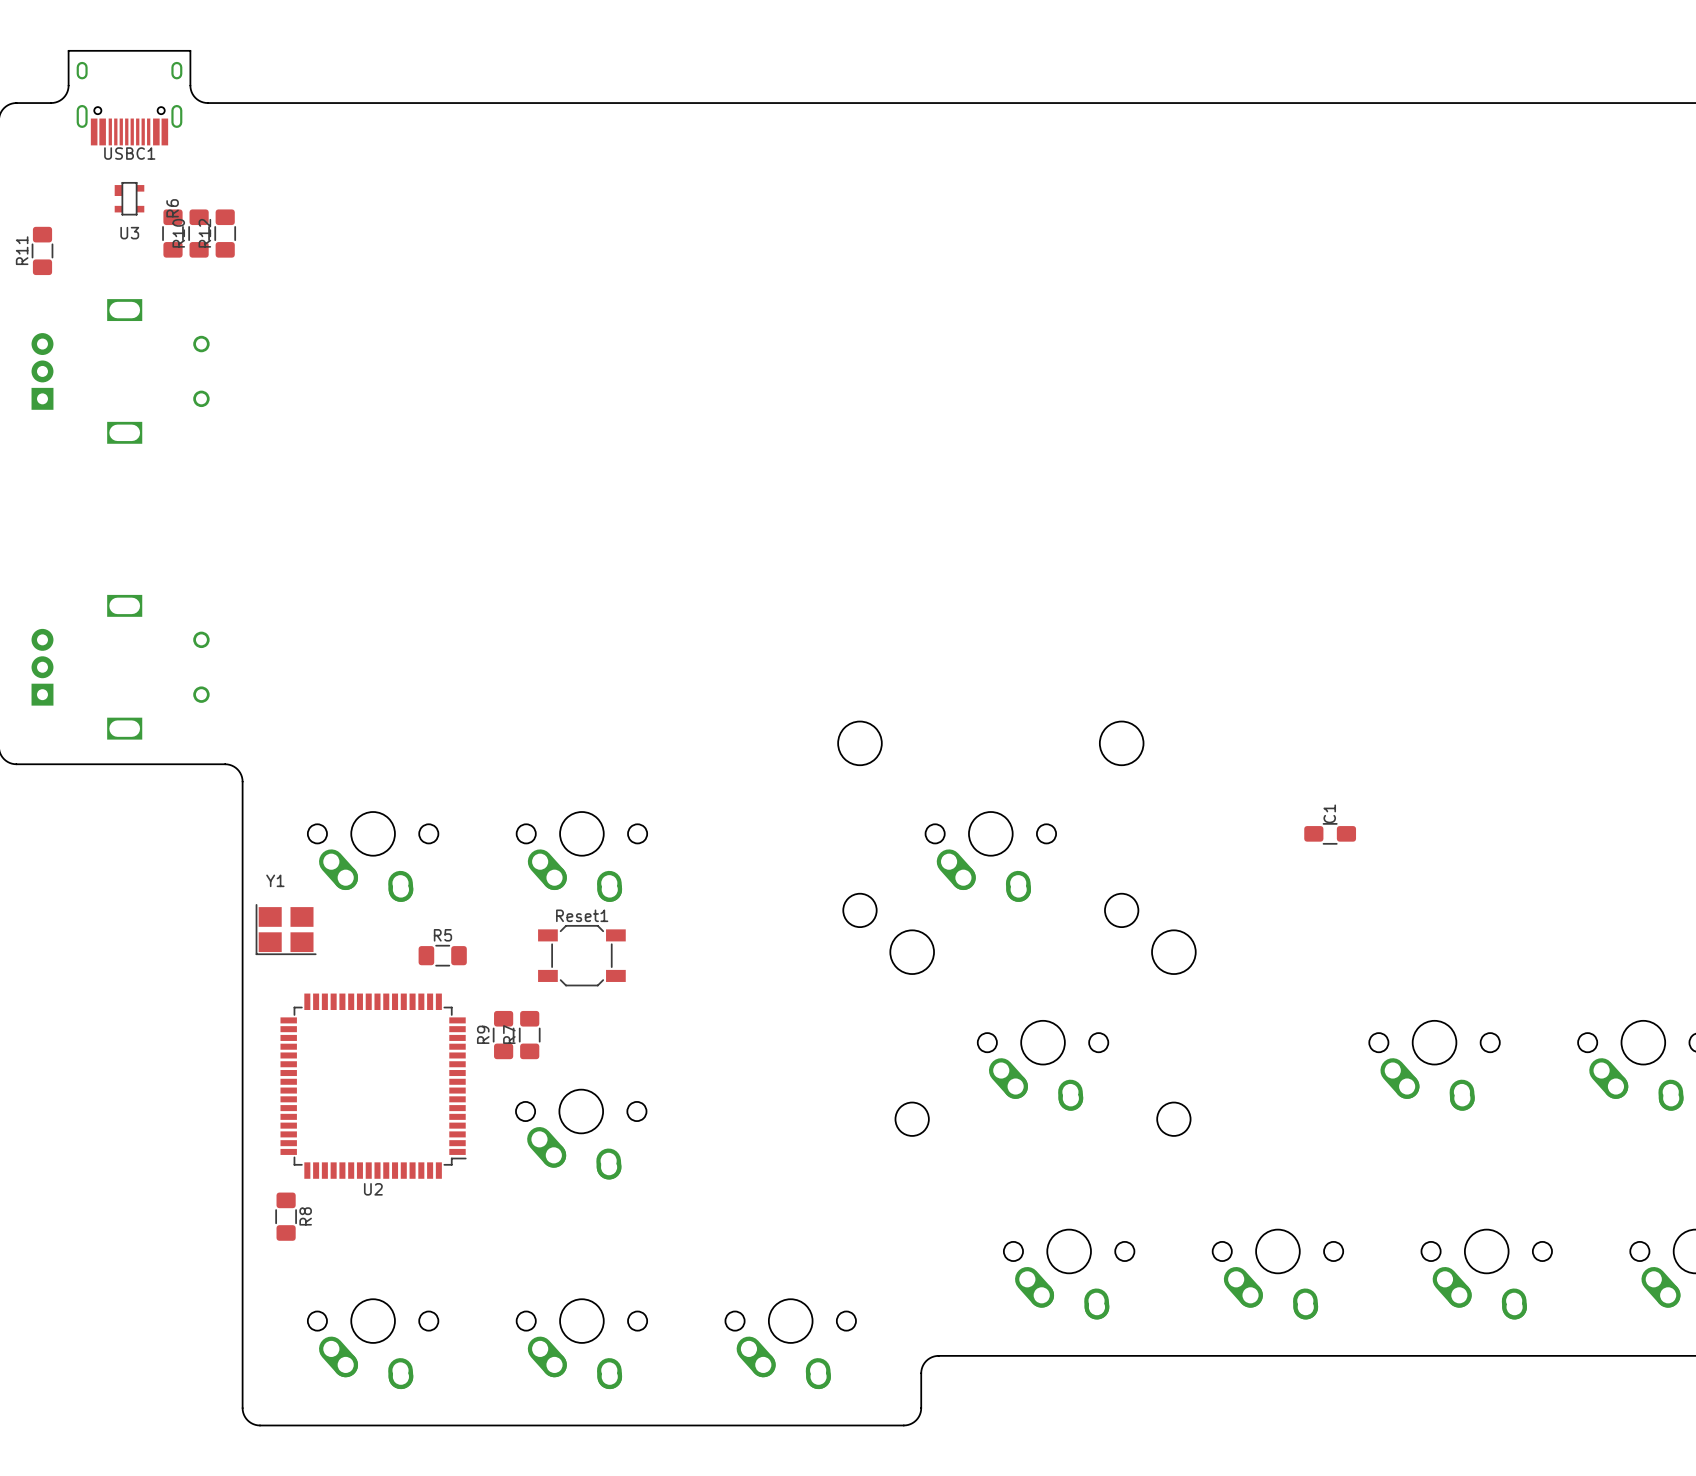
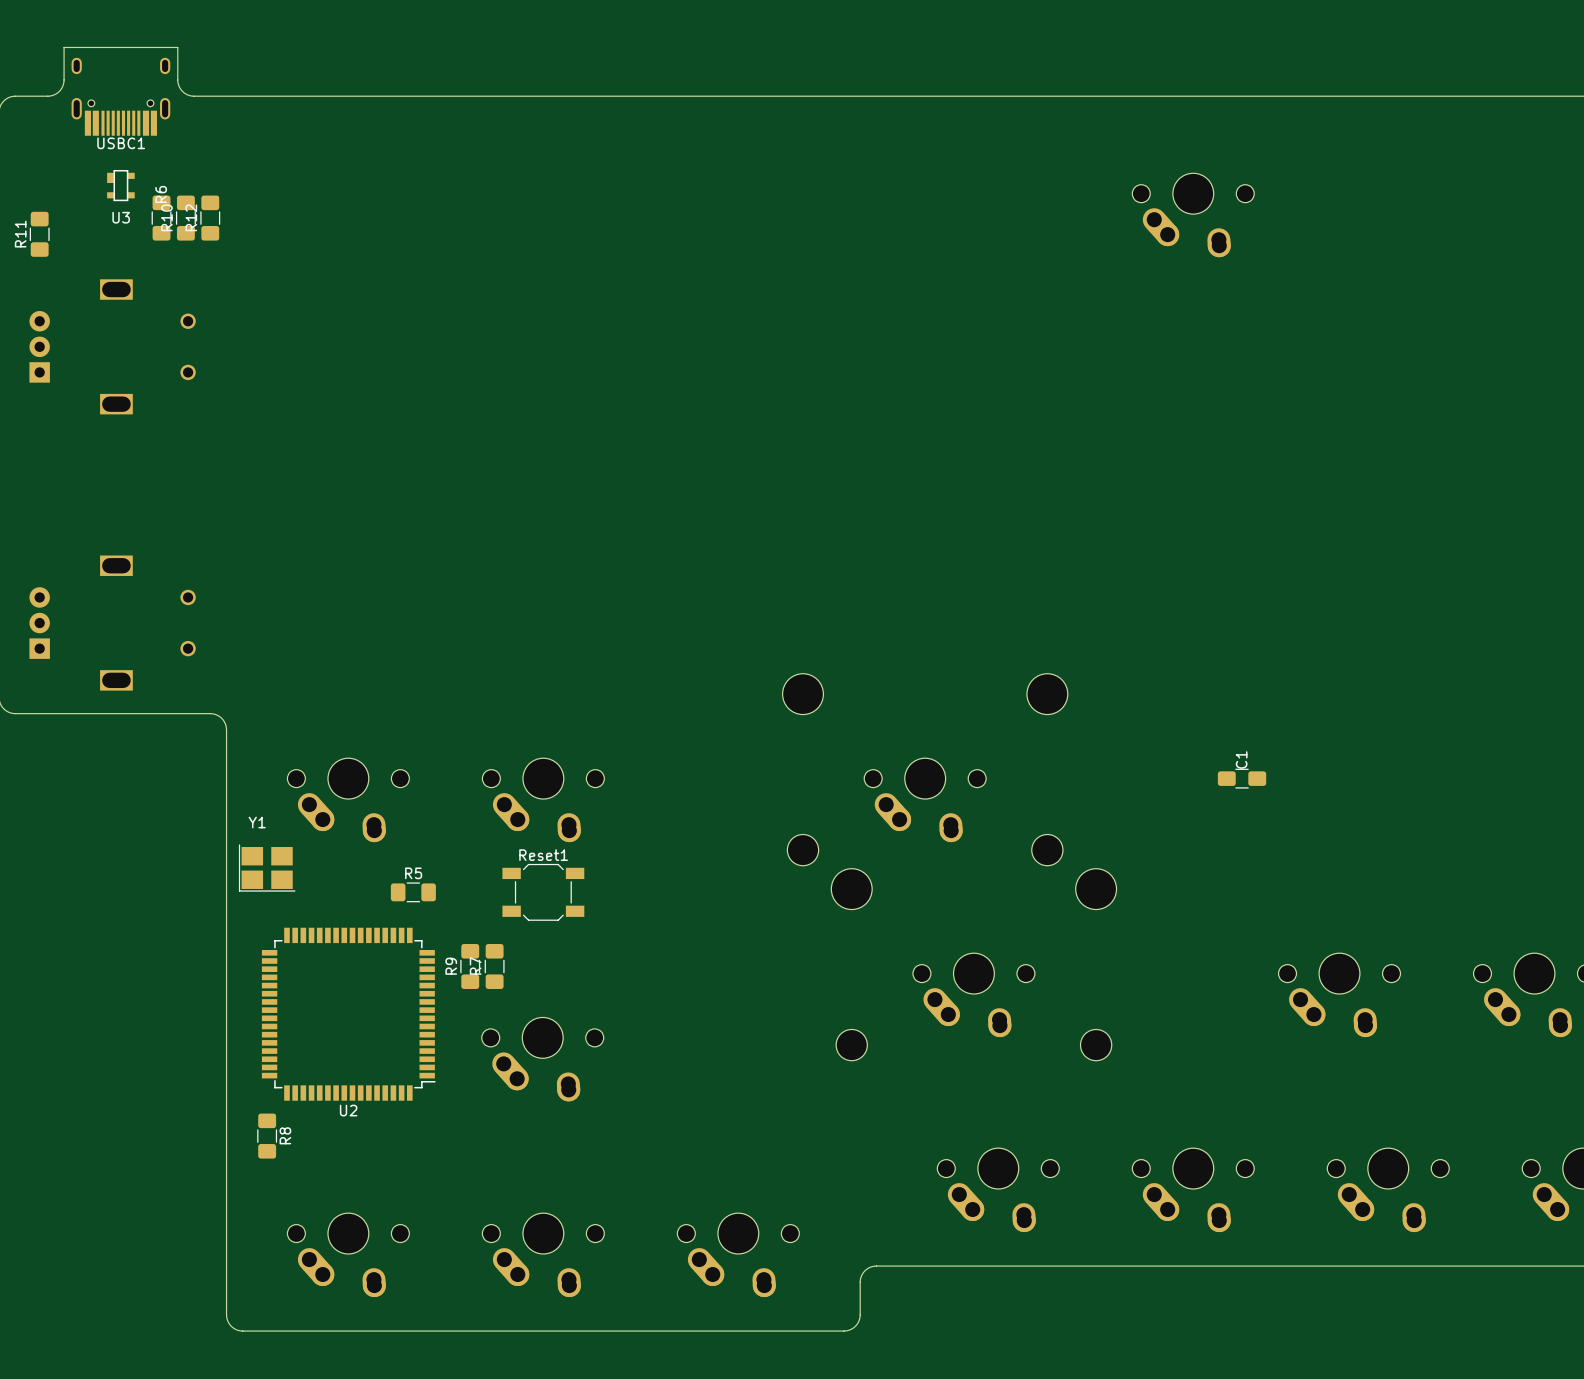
part: none -> (1193, 215)

